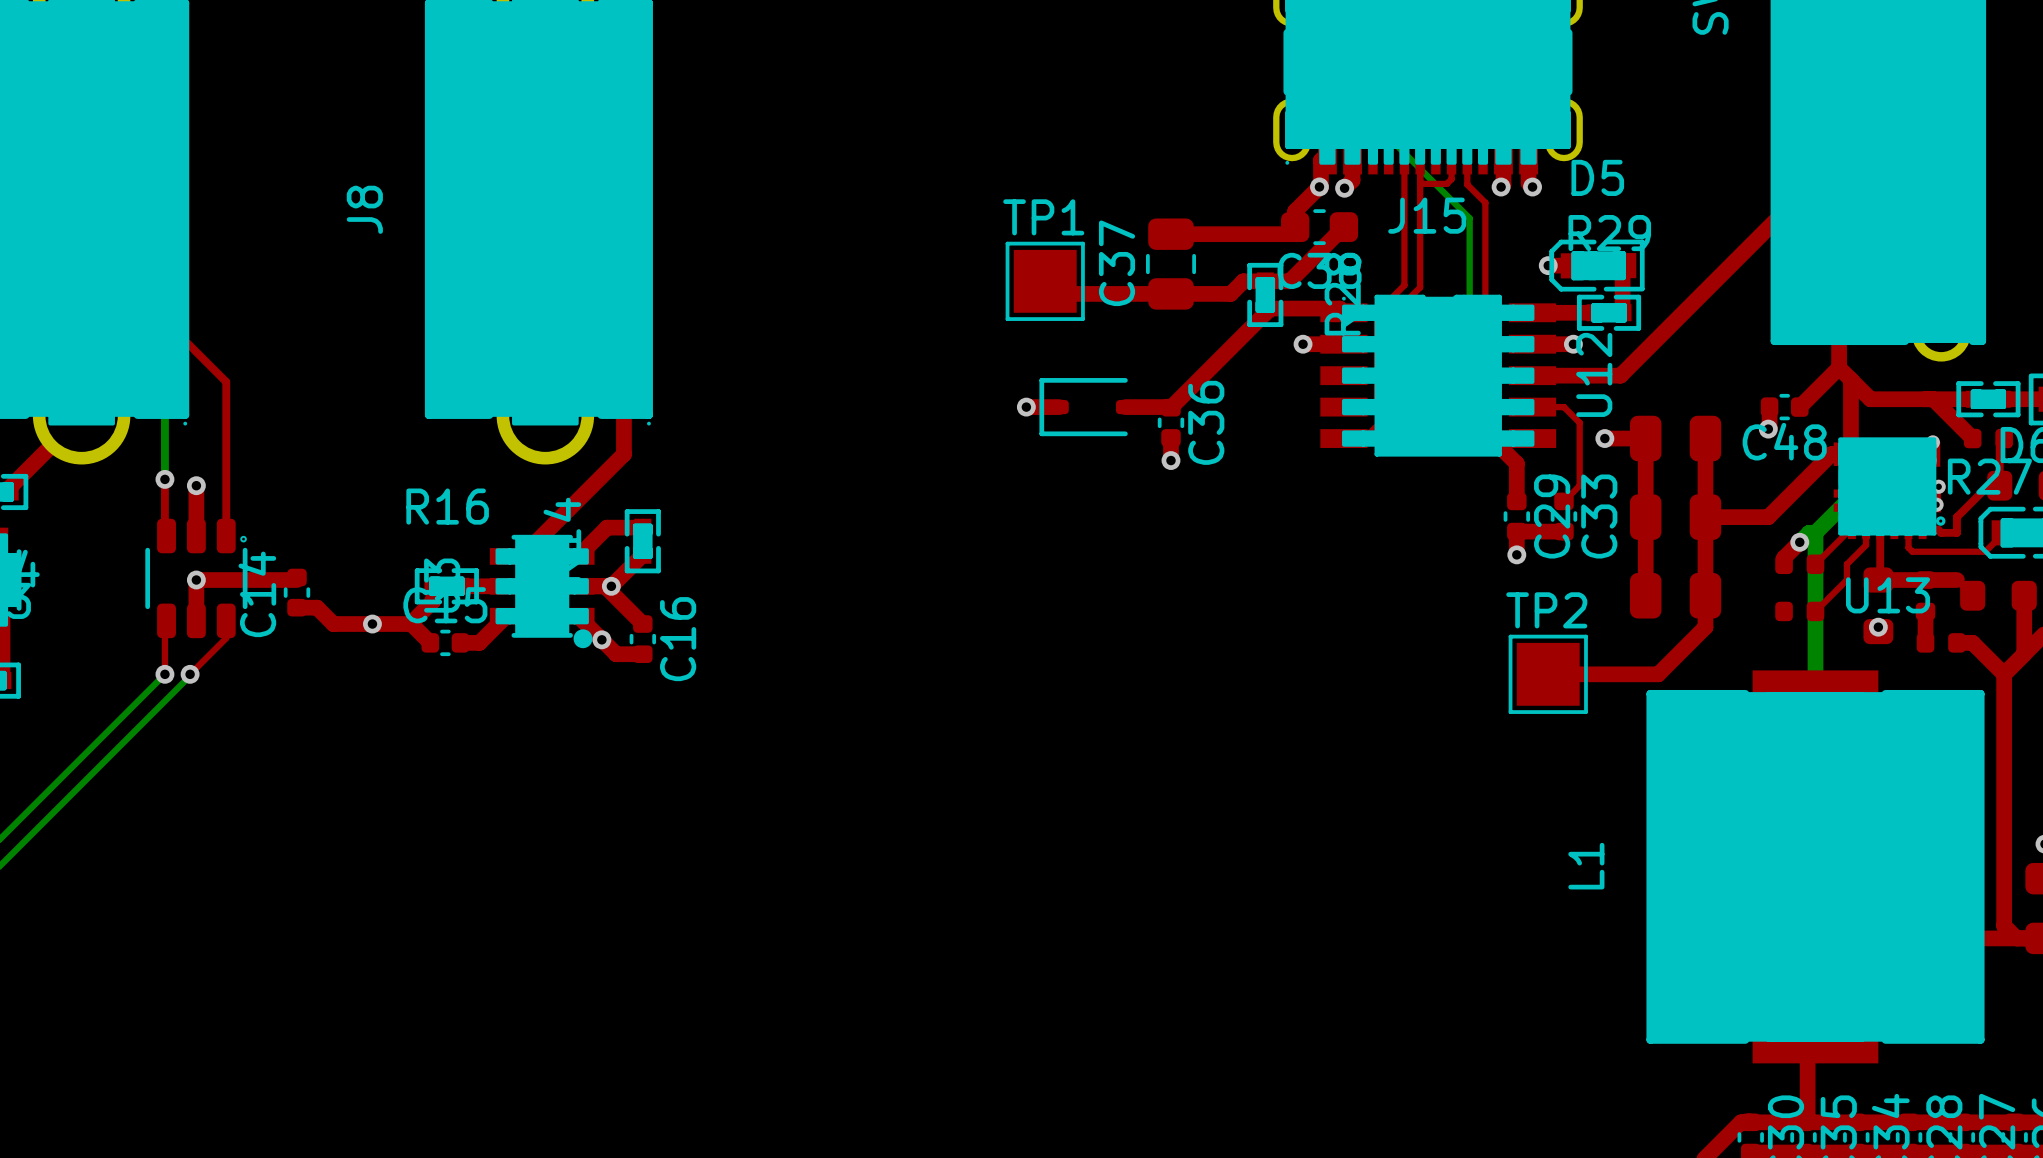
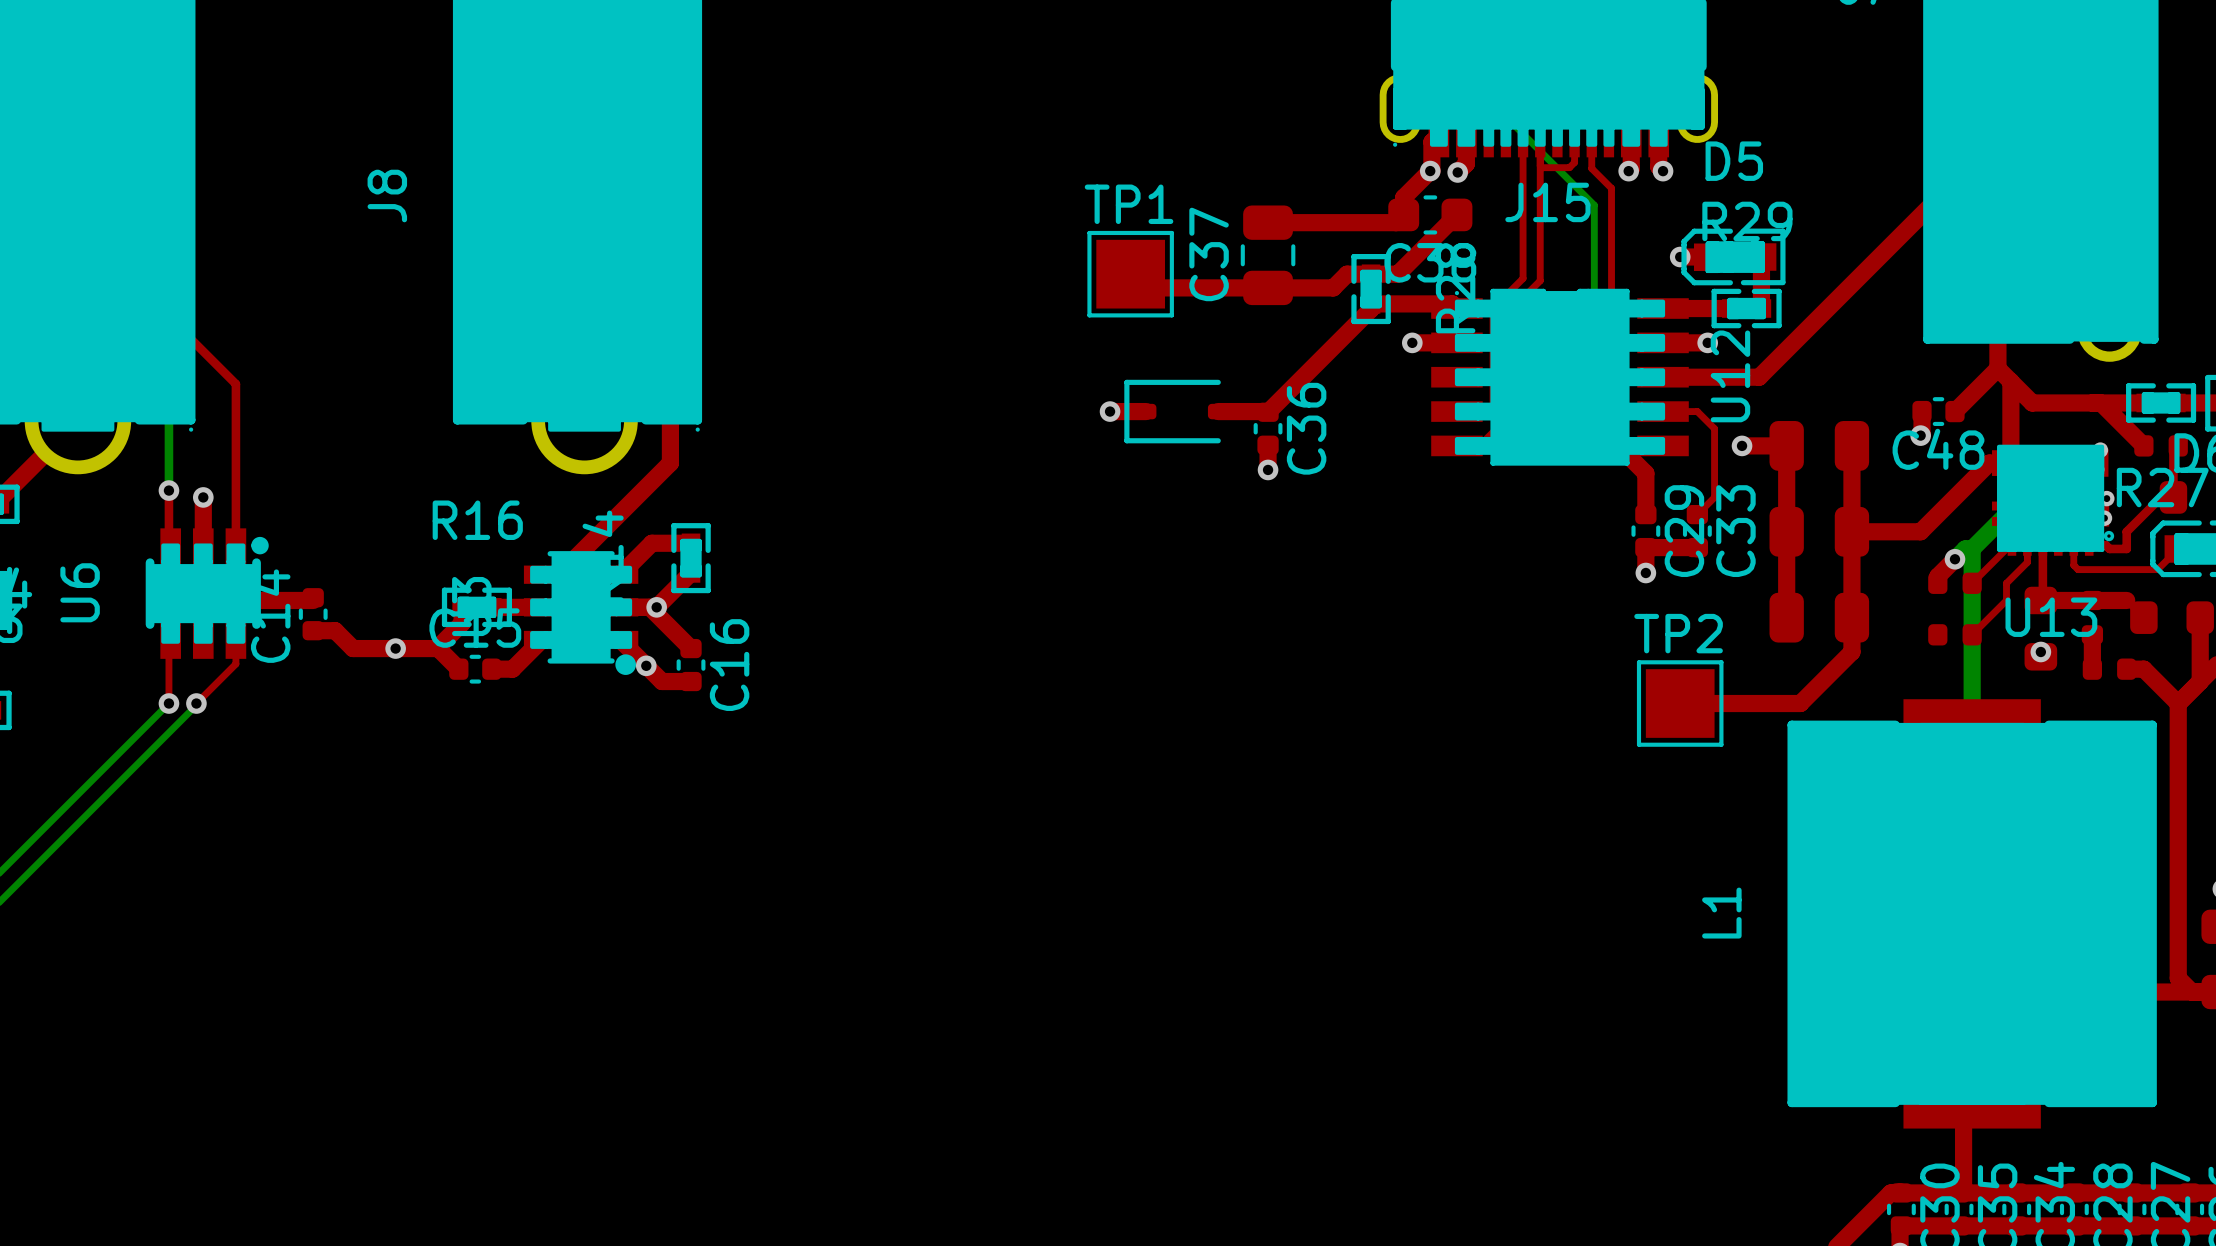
U6: none -> (207, 593)
part: (196, 578) -> none

